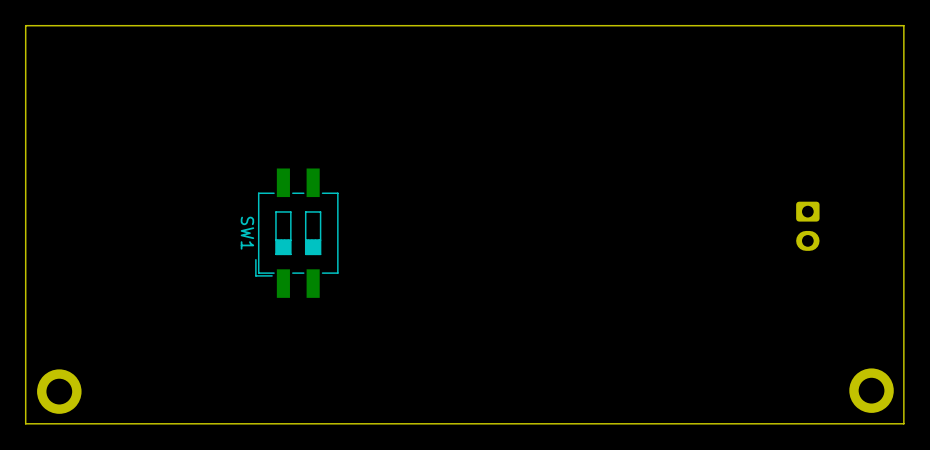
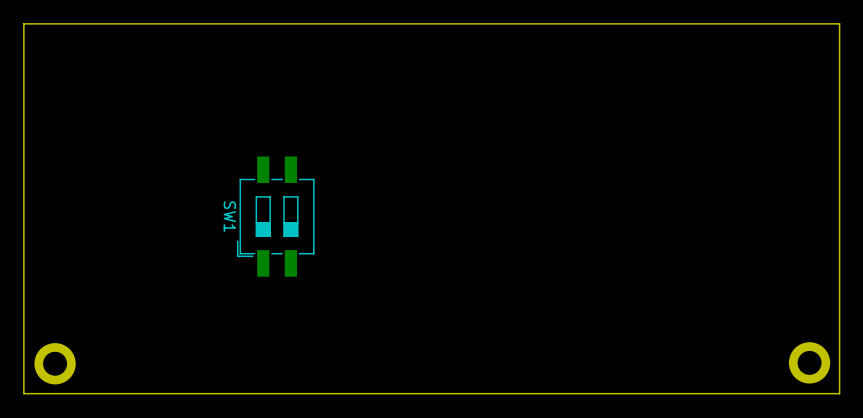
part: (807, 226) -> none

